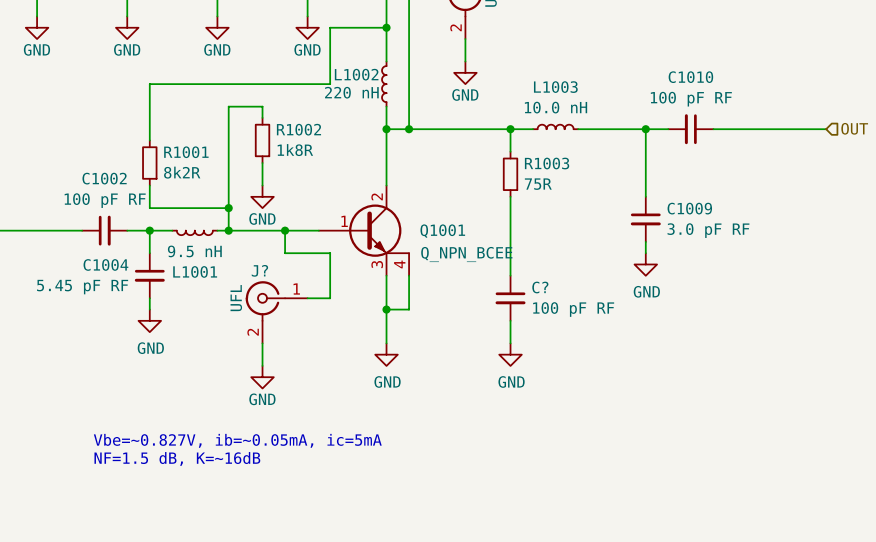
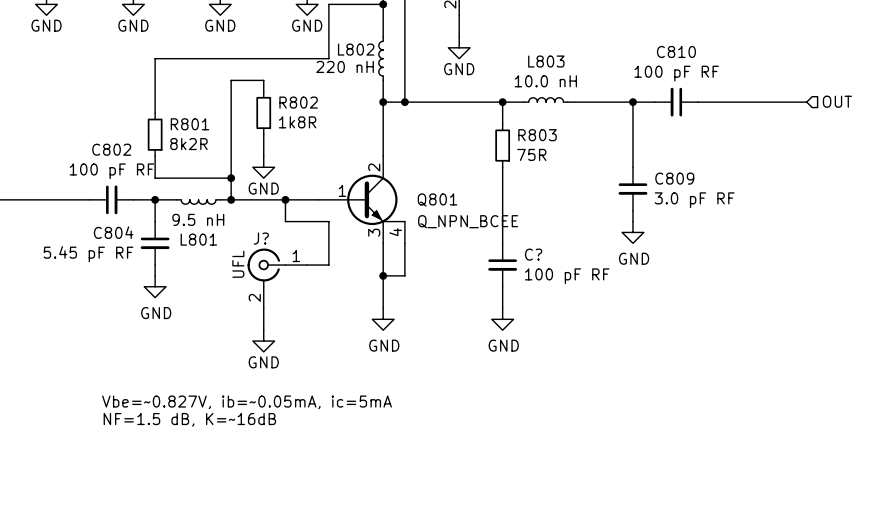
L1002 name: L1002 (356, 74) -> L802 (356, 49)
C1010 name: C1010 (690, 77) -> C810 (676, 51)
L1003 name: L1003 (555, 87) -> L803 (546, 61)
R1002 name: R1002 (298, 129) -> R802 (298, 102)
R1001 name: R1001 (186, 152) -> R801 (190, 124)
R1003 name: R1003 (547, 163) -> R803 (537, 135)
C1002 name: C1002 (104, 178) -> C802 (111, 149)
C1009 name: C1009 (689, 208) -> C809 (674, 178)
Q1001 name: Q1001 (442, 231) -> Q801 (437, 199)
C1004 name: C1004 (105, 264) -> C804 (113, 232)
L1001 name: L1001 (195, 271) -> L801 (198, 239)

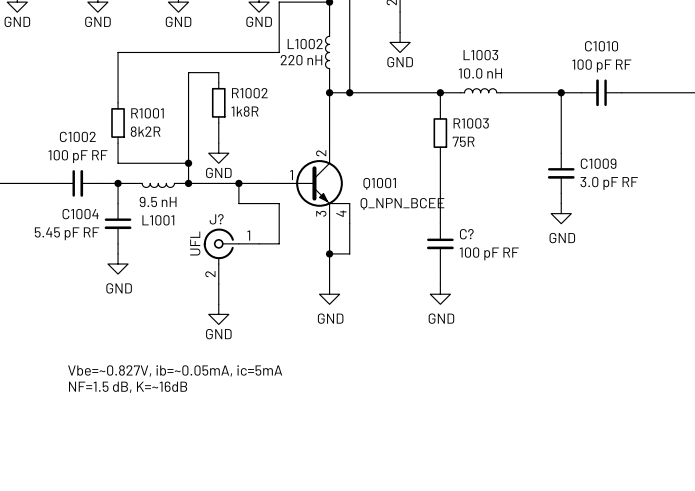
L802 name: L802 (356, 49) -> L1002 (305, 44)
C810 name: C810 (676, 51) -> C1010 (601, 46)
L803 name: L803 (546, 61) -> L1003 (480, 55)
R802 name: R802 (298, 102) -> R1002 (249, 93)
R801 name: R801 (190, 124) -> R1001 (147, 113)
R803 name: R803 (537, 135) -> R1003 (471, 123)
C802 name: C802 (111, 149) -> C1002 (77, 136)
C809 name: C809 (674, 178) -> C1009 (598, 163)
Q801 name: Q801 (437, 199) -> Q1001 (379, 183)
C804 name: C804 (113, 232) -> C1004 (80, 214)
L801 name: L801 (198, 239) -> L1001 (158, 220)

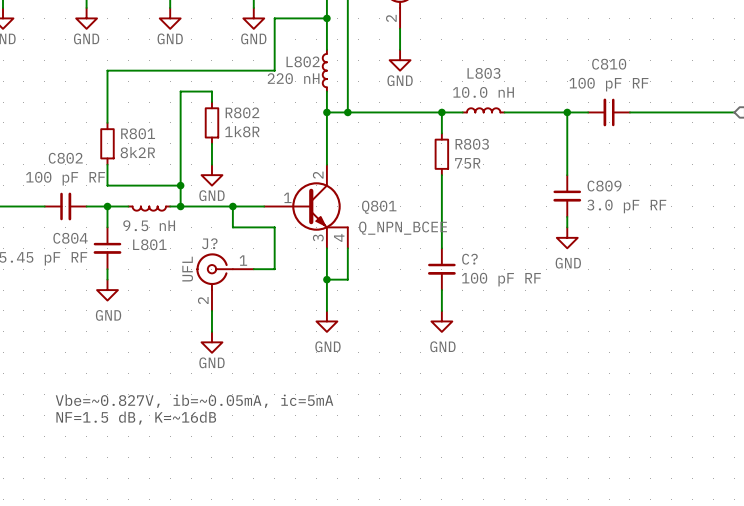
L1002 name: L1002 (305, 44) -> L802 (303, 61)
C1010 name: C1010 (601, 46) -> C810 (609, 64)
L1003 name: L1003 (480, 55) -> L803 (483, 73)
R1002 name: R1002 (249, 93) -> R802 (242, 112)
R1001 name: R1001 (147, 113) -> R801 (138, 133)
R1003 name: R1003 (471, 123) -> R803 (472, 144)
C1002 name: C1002 (77, 136) -> C802 (65, 158)
C1009 name: C1009 (598, 163) -> C809 (604, 186)
Q1001 name: Q1001 (379, 183) -> Q801 (379, 207)
C1004 name: C1004 (80, 214) -> C804 (70, 238)
L1001 name: L1001 (158, 220) -> L801 (149, 244)

